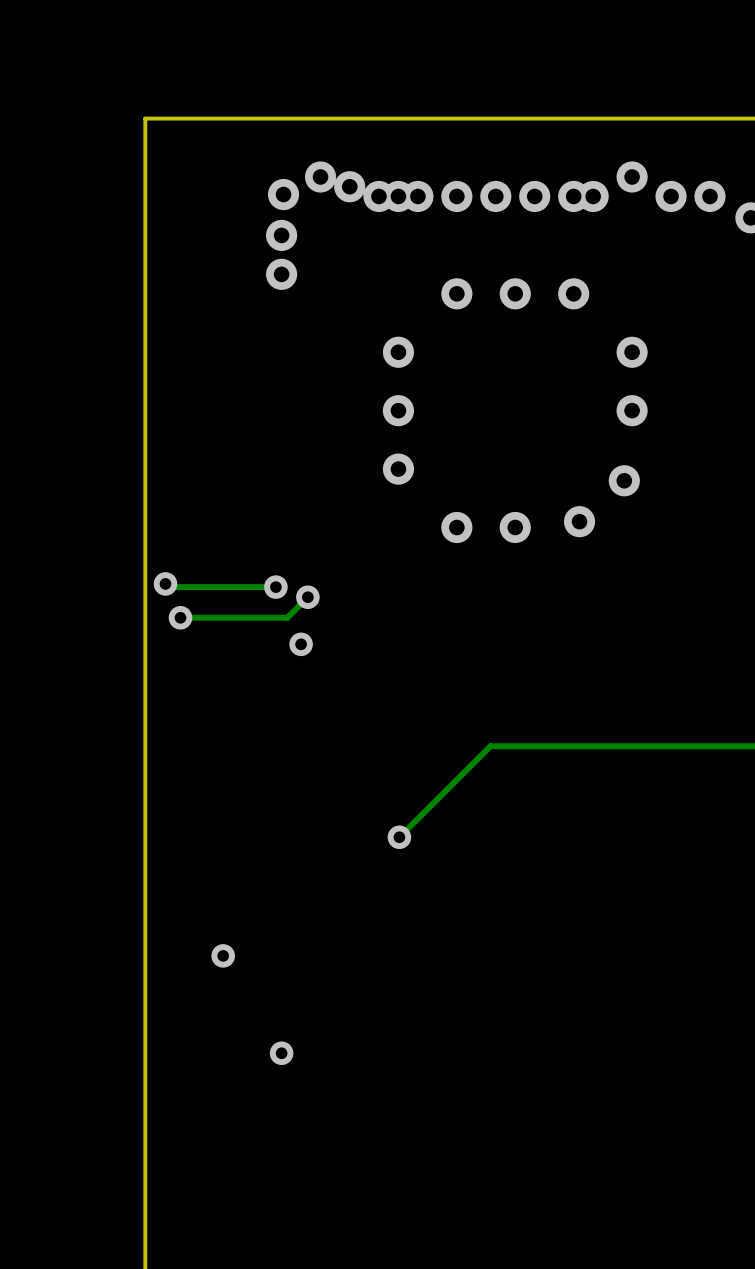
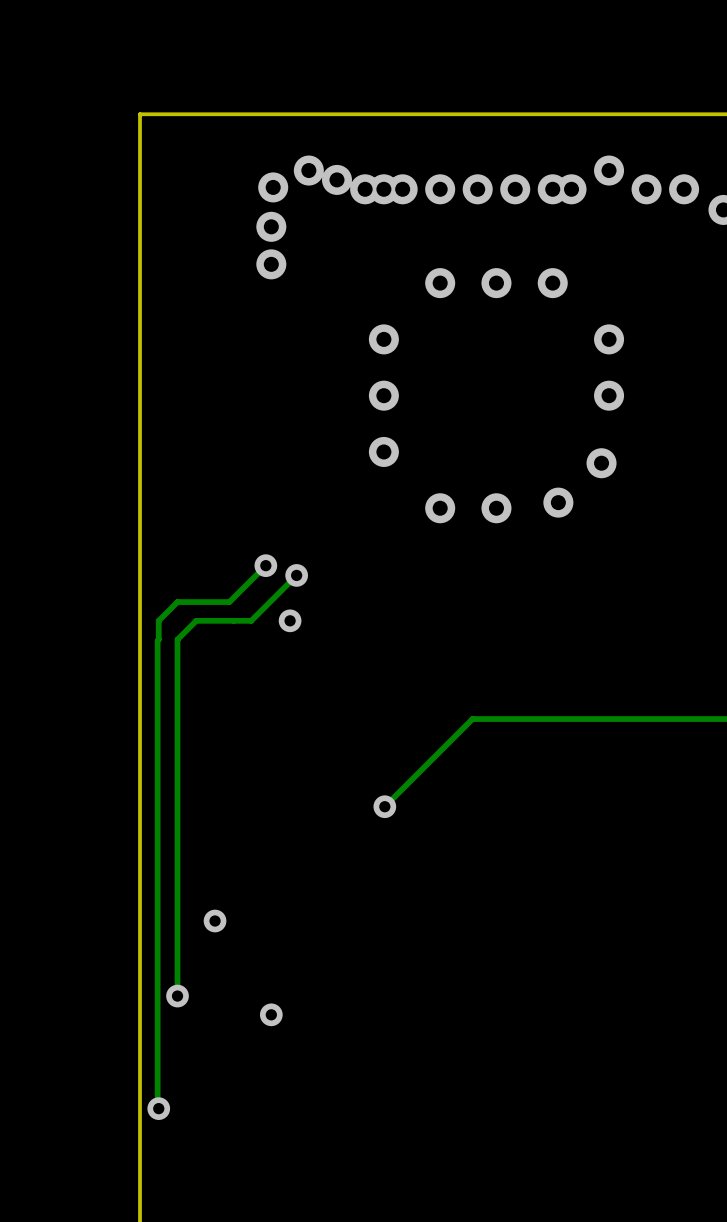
track: (165, 583) (168, 587) (275, 587) -> (158, 1108) (158, 620) (177, 602) (229, 602) (265, 565)
via: (165, 583) -> none
via: (180, 617) -> none
track: (287, 617) (180, 617) -> (276, 595) (251, 620) (196, 620) (177, 639) (177, 996)
via: none -> (177, 996)
via: none -> (158, 1108)

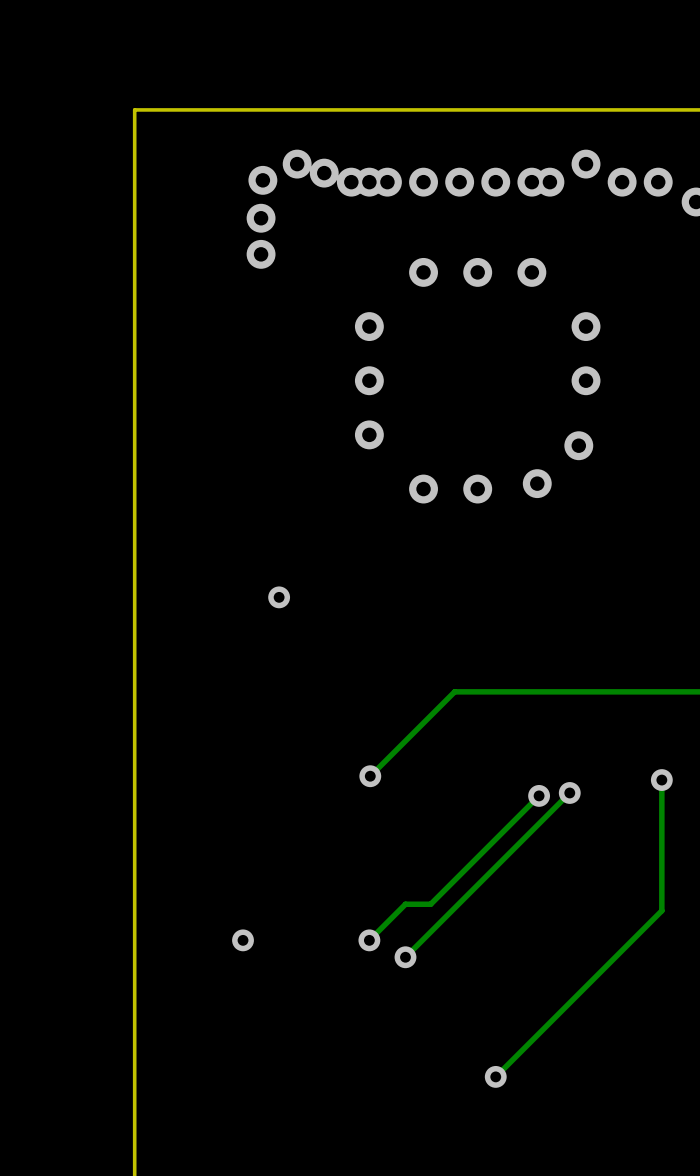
track: (265, 565) (229, 602) (177, 602) (158, 620) (158, 1108) -> none
via: (265, 565) -> none
track: (296, 575) (251, 620) (196, 620) (177, 639) (177, 996) -> none
via: (296, 575) -> none
track: none -> (661, 780) (661, 910) (495, 1076)
via: none -> (661, 780)
track: none -> (569, 792) (405, 958)
via: none -> (569, 792)
track: none -> (539, 795) (430, 904) (405, 904) (369, 940)
via: none -> (539, 795)
via: (215, 921) -> none
via: none -> (243, 940)
via: none -> (369, 940)
via: none -> (405, 957)
via: (177, 996) -> none
via: (271, 1014) -> none
via: (158, 1108) -> none
via: none -> (495, 1076)

